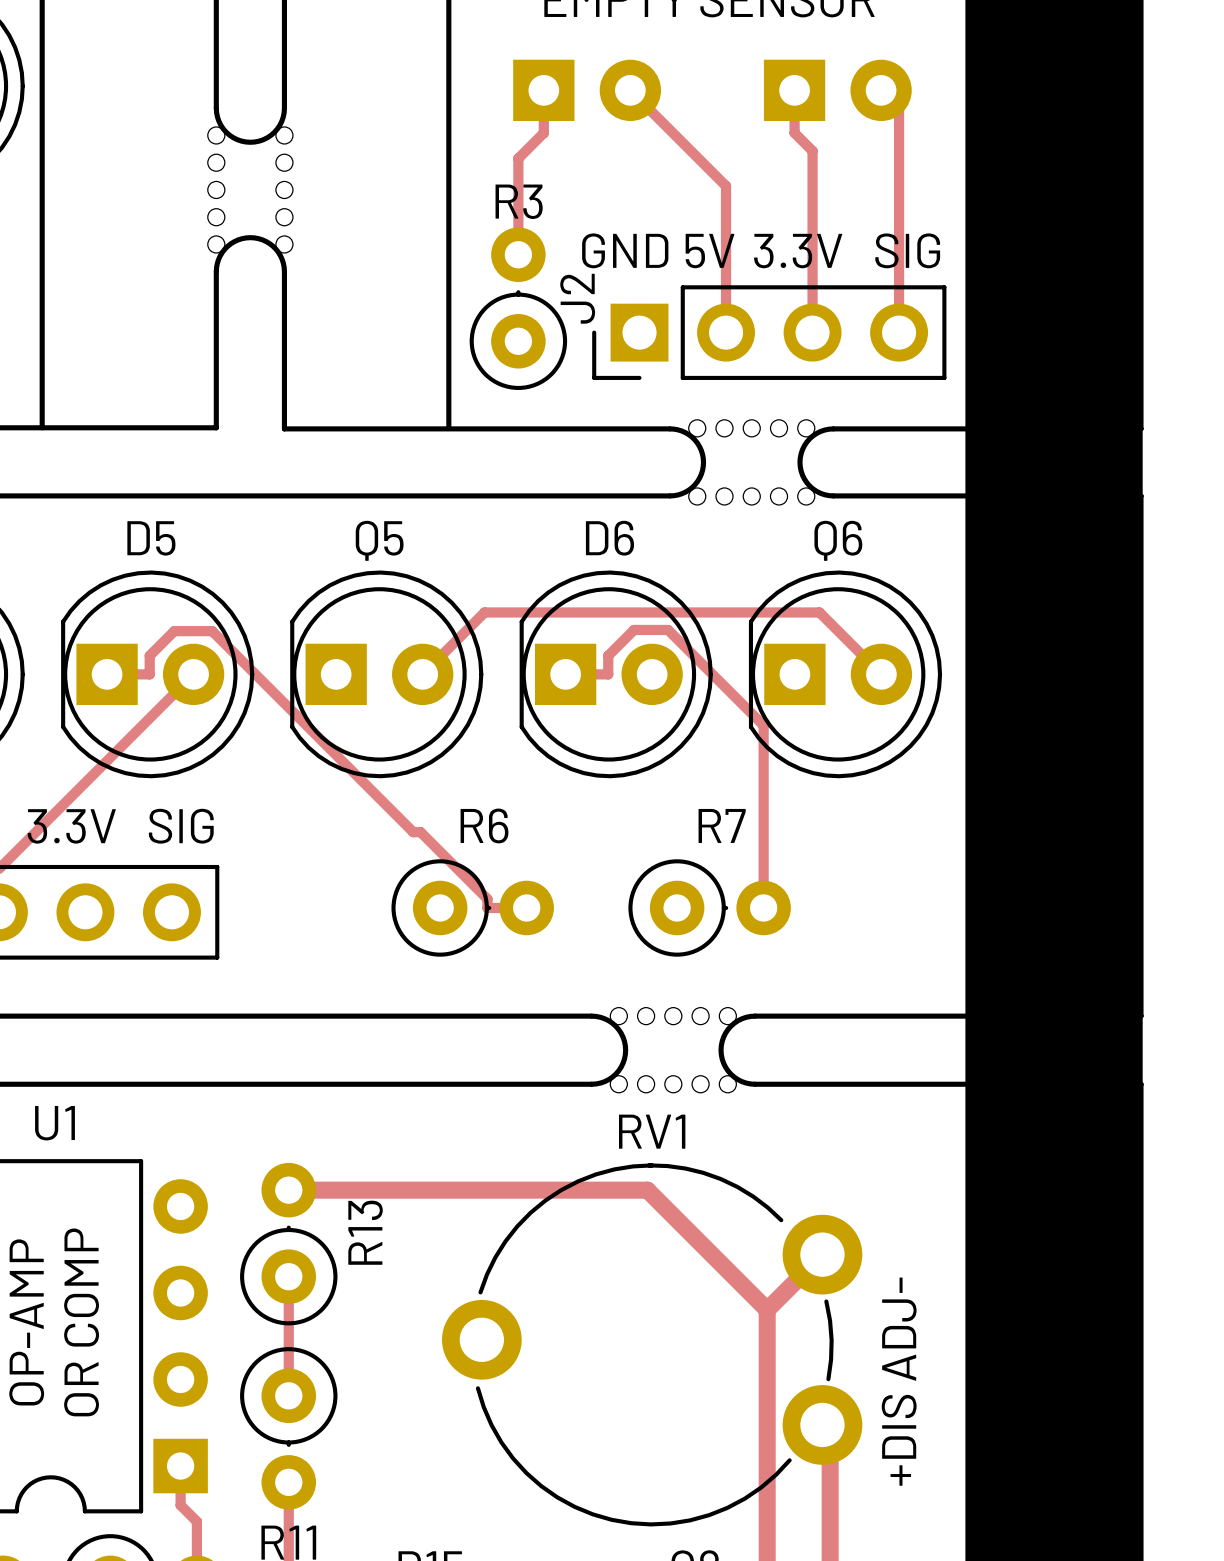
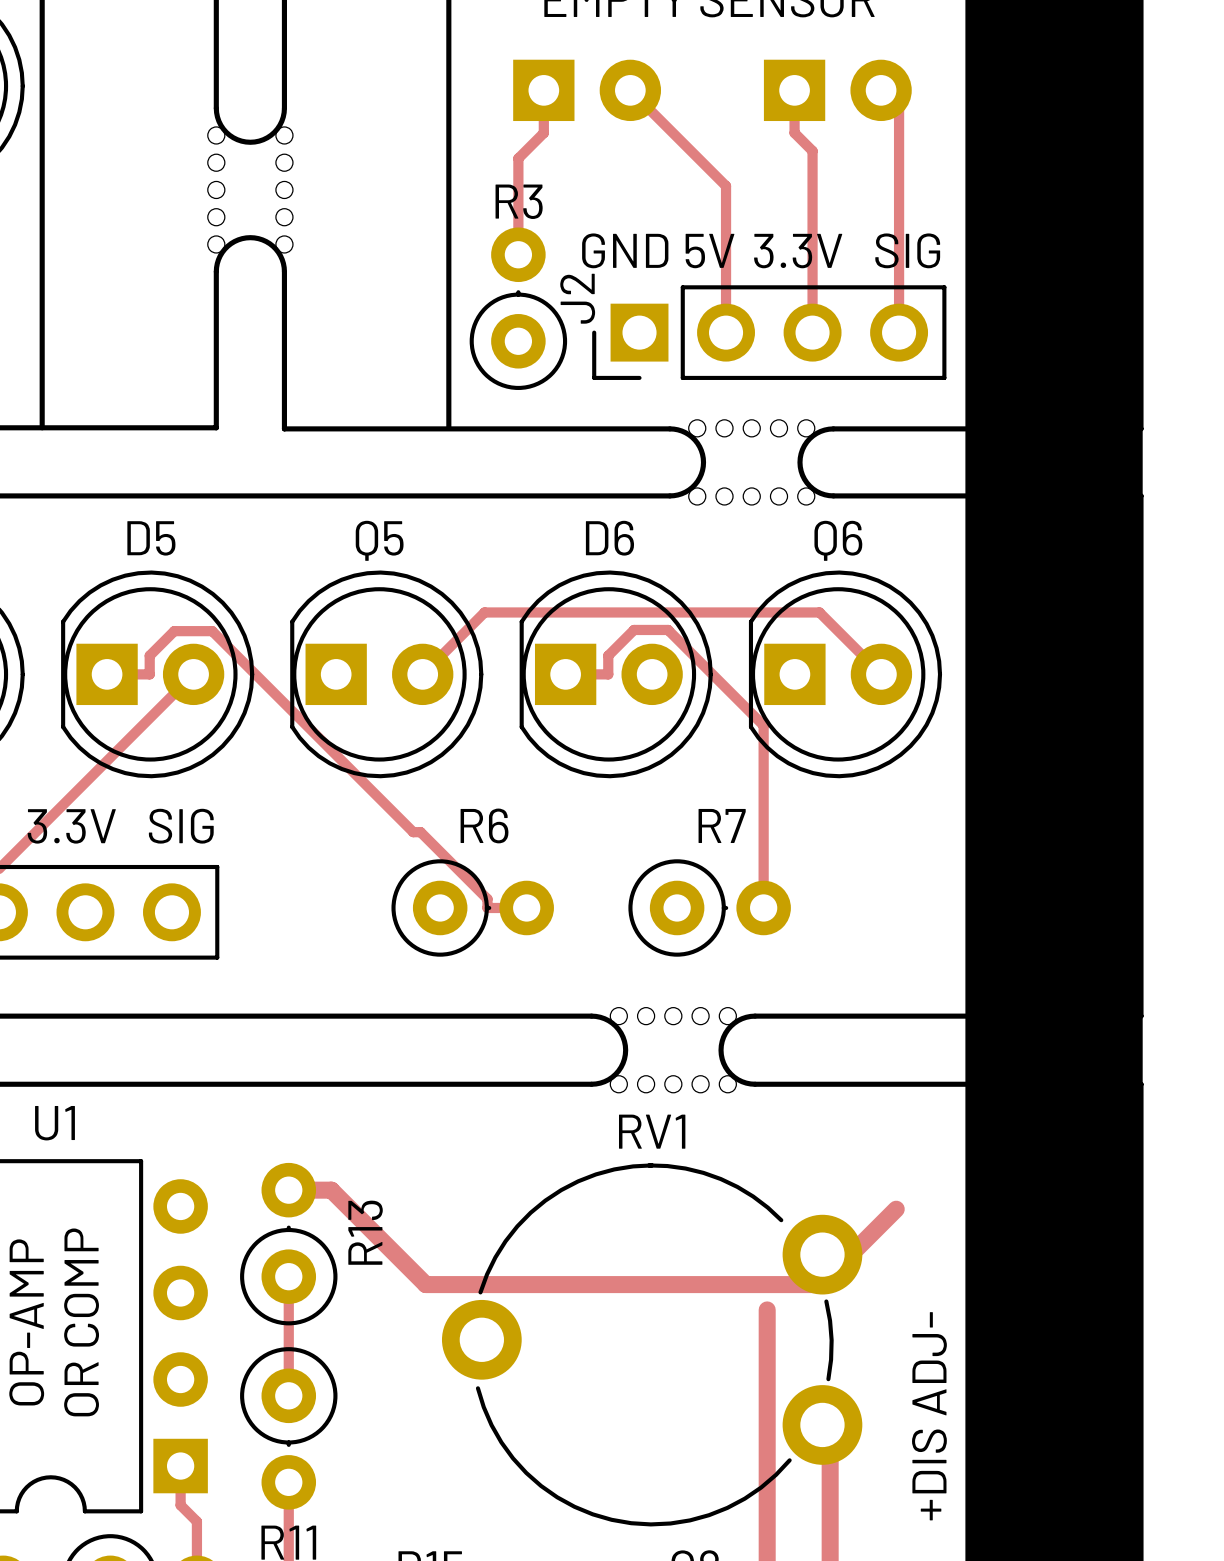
track: (331, 1190) (647, 1190) (767, 1309) (822, 1254) -> (331, 1190) (425, 1284) (820, 1284) (896, 1209)
text position: +DIS ADJ- (899, 1381) -> +DIS ADJ- (929, 1416)

